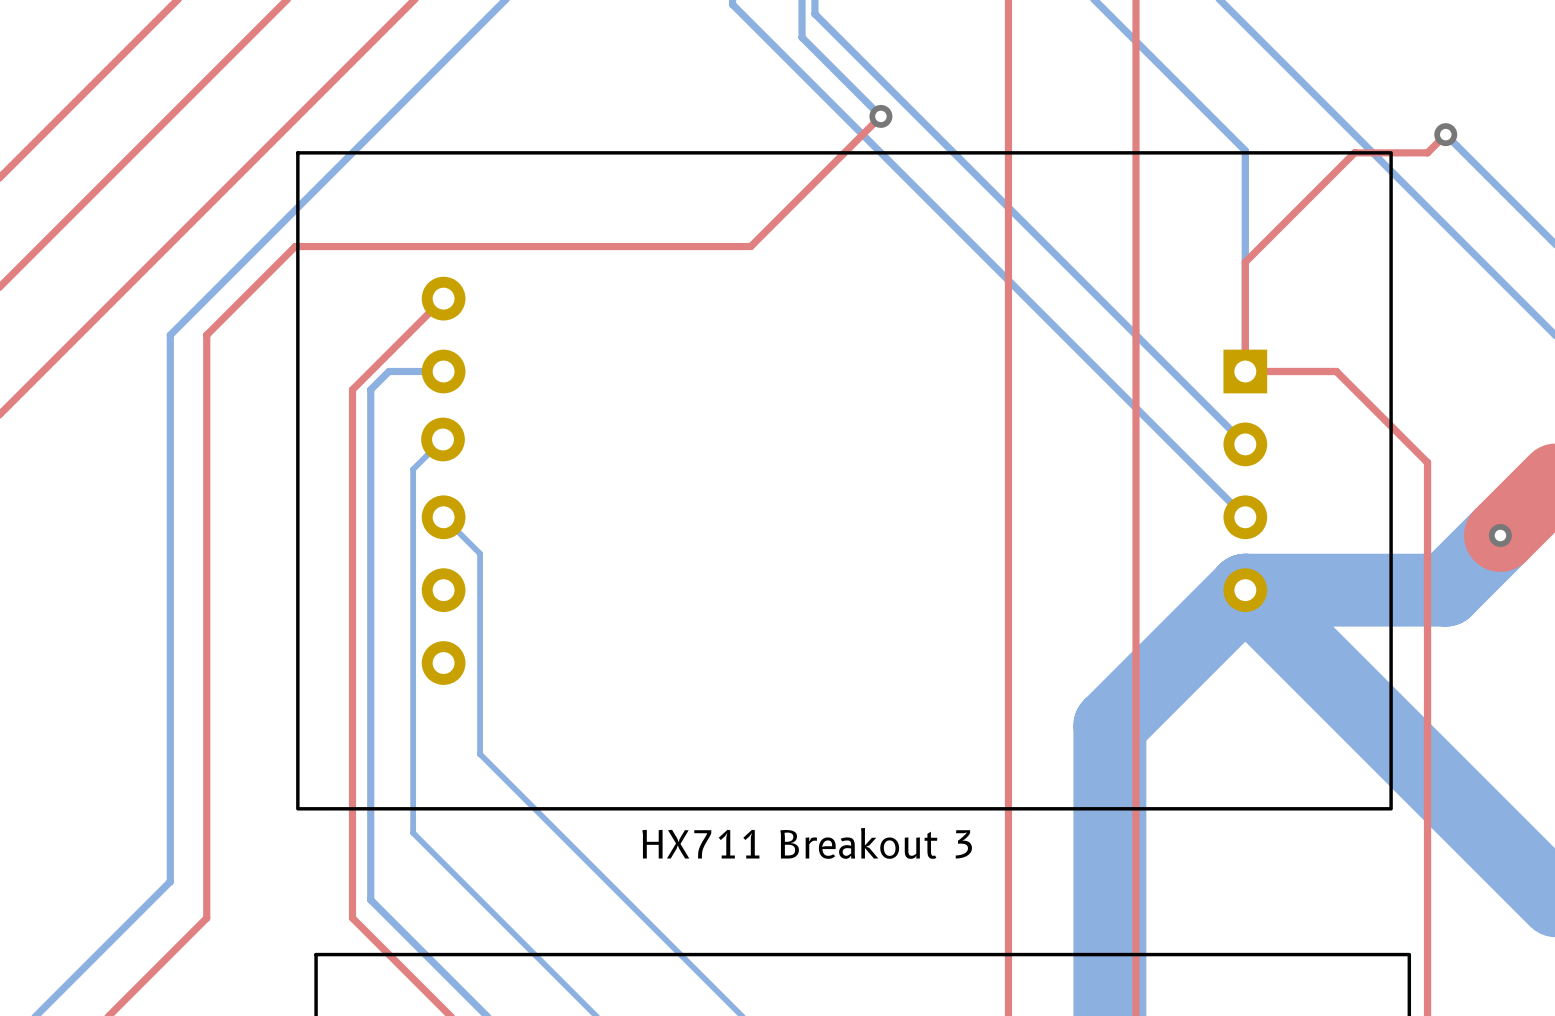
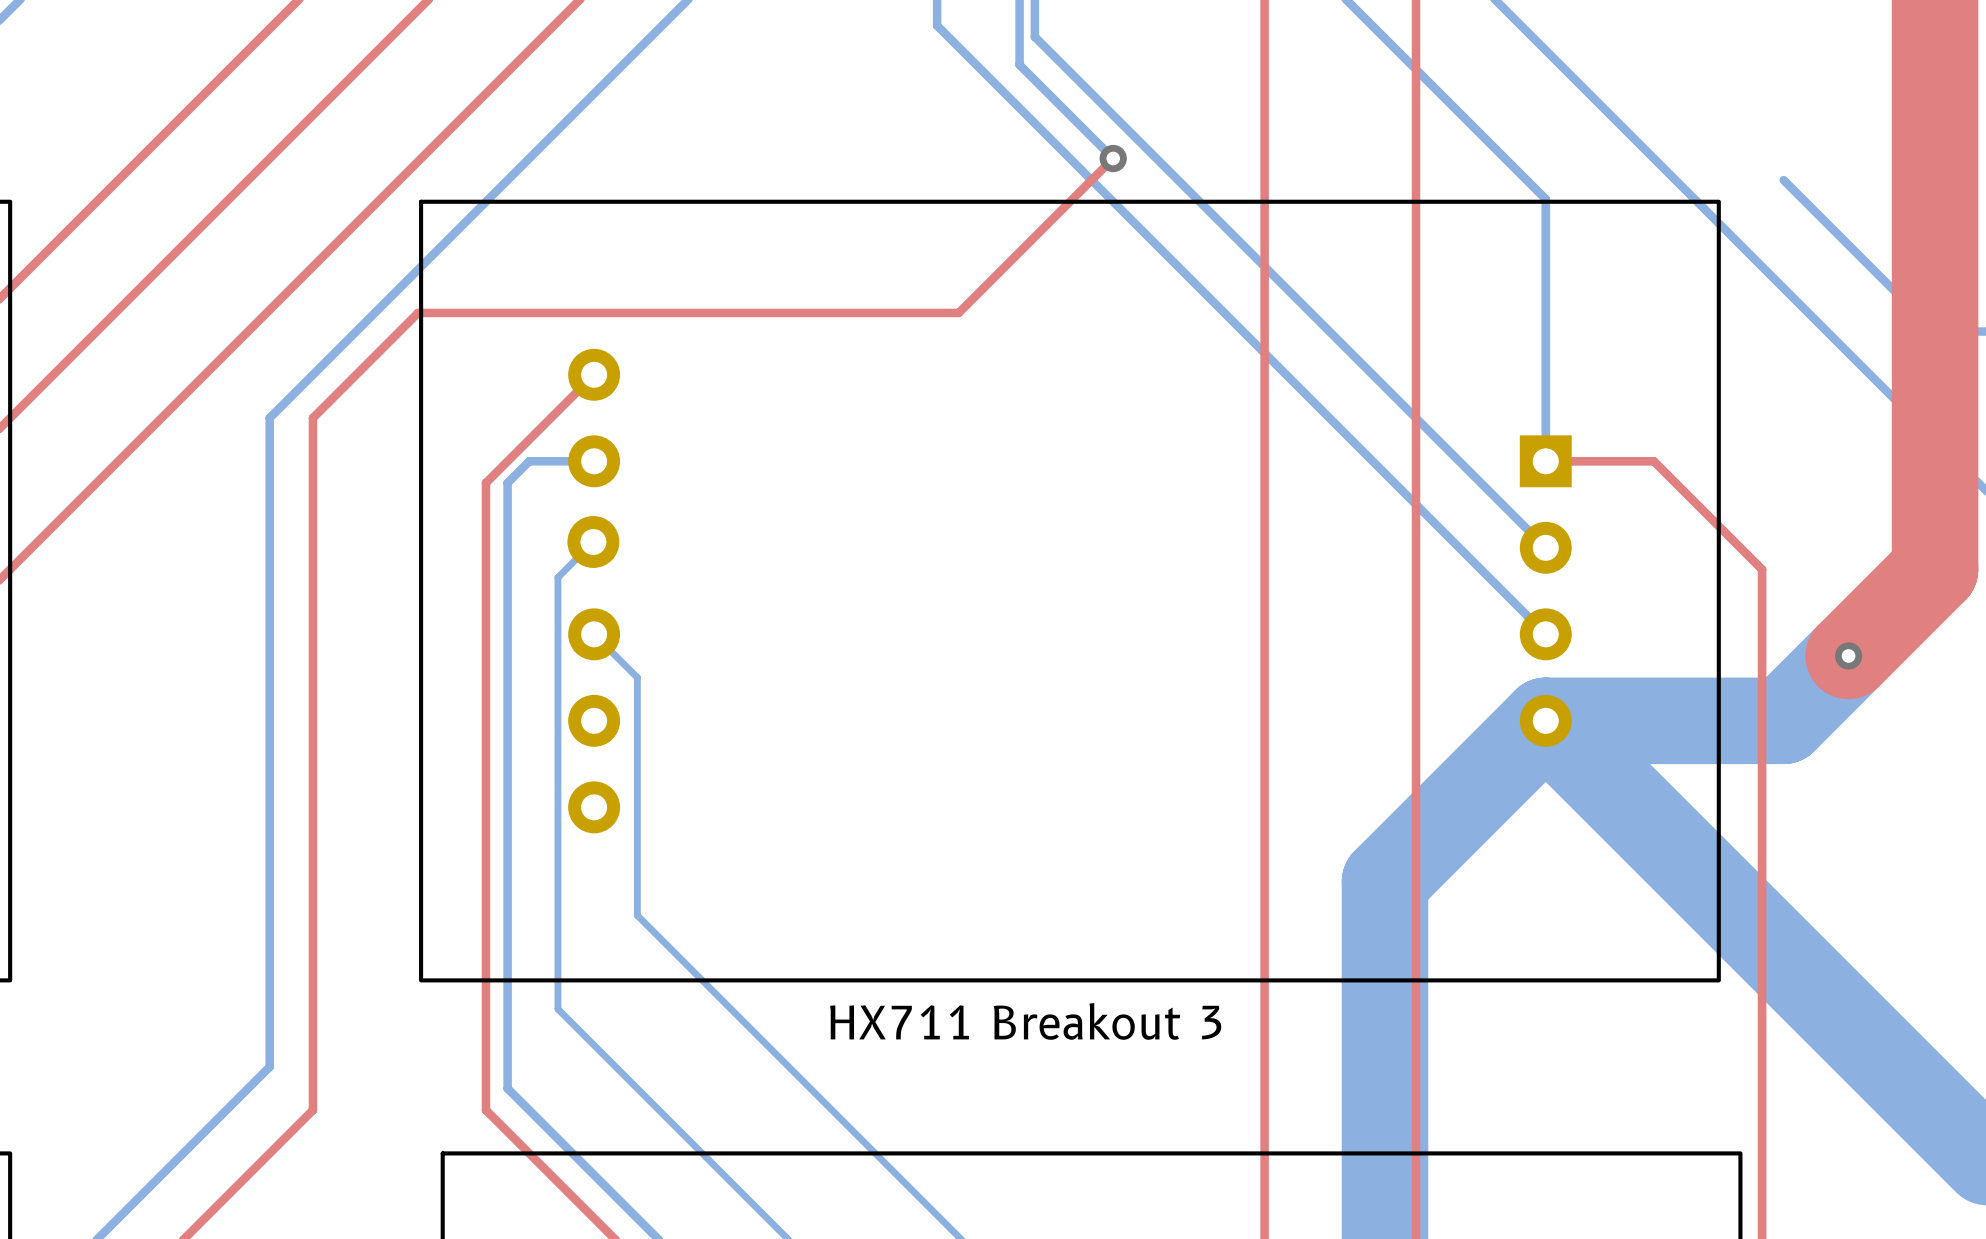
top track: (1445, 134) (1427, 152) (1354, 152) (1245, 262) (1245, 371) -> none
via: (1445, 134) -> none

